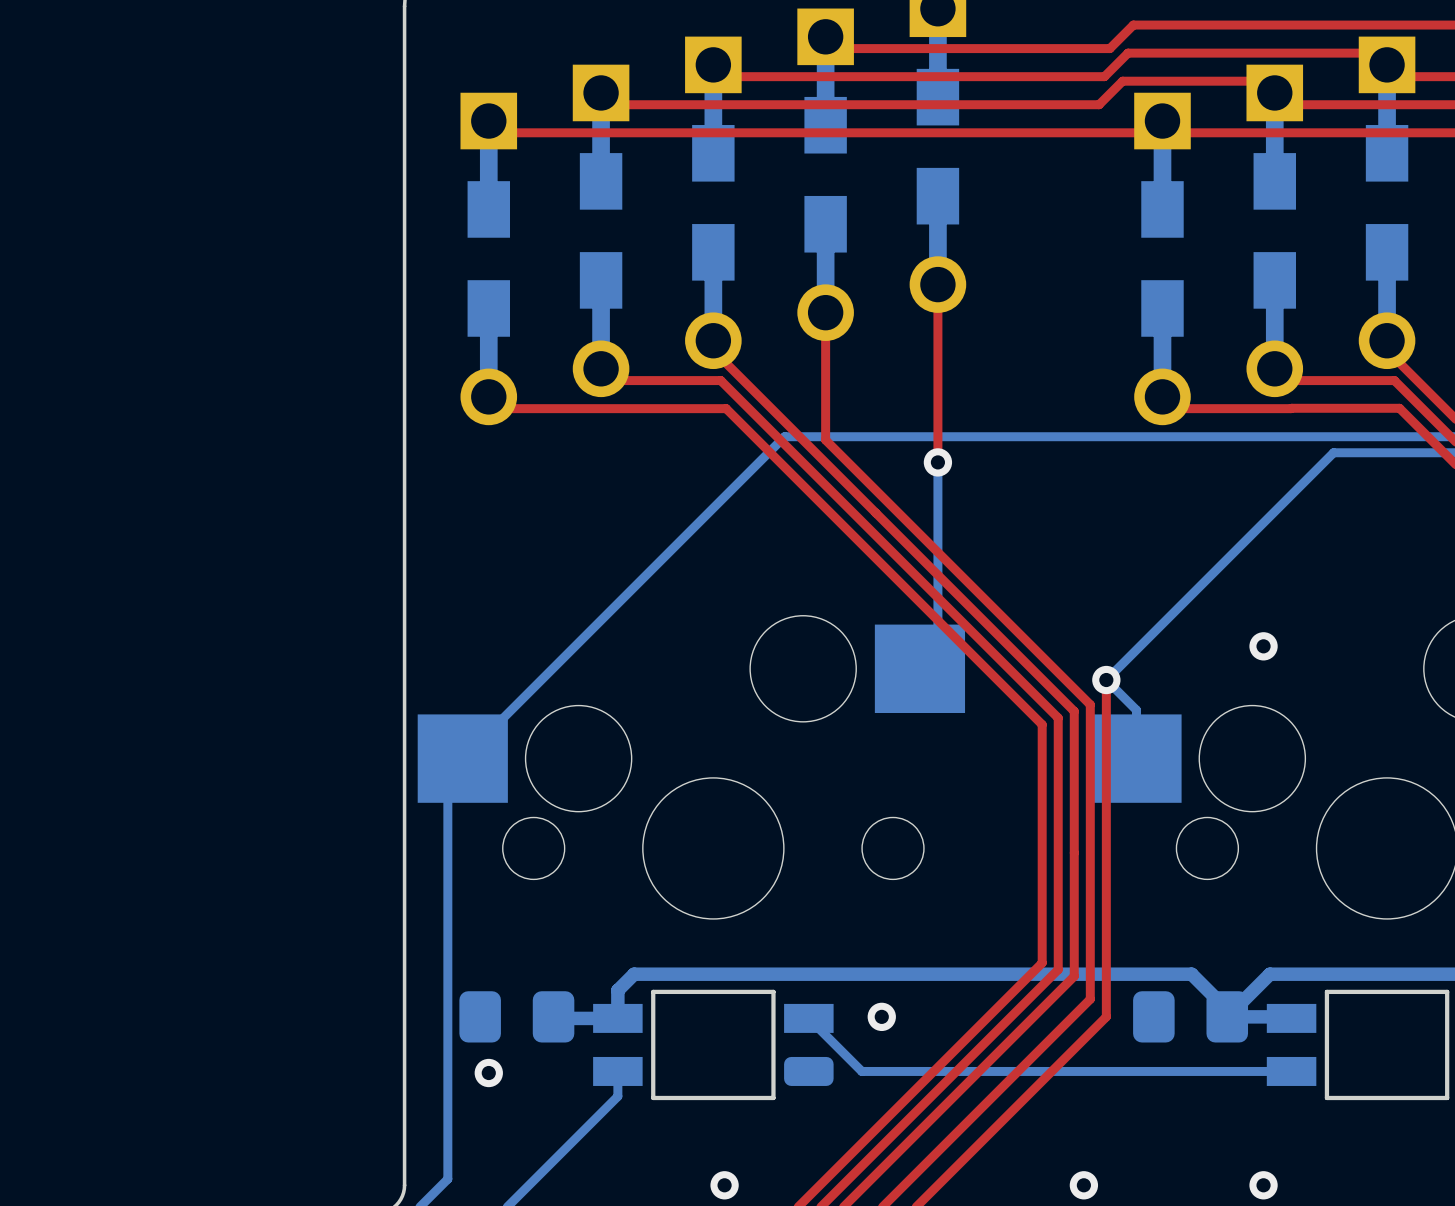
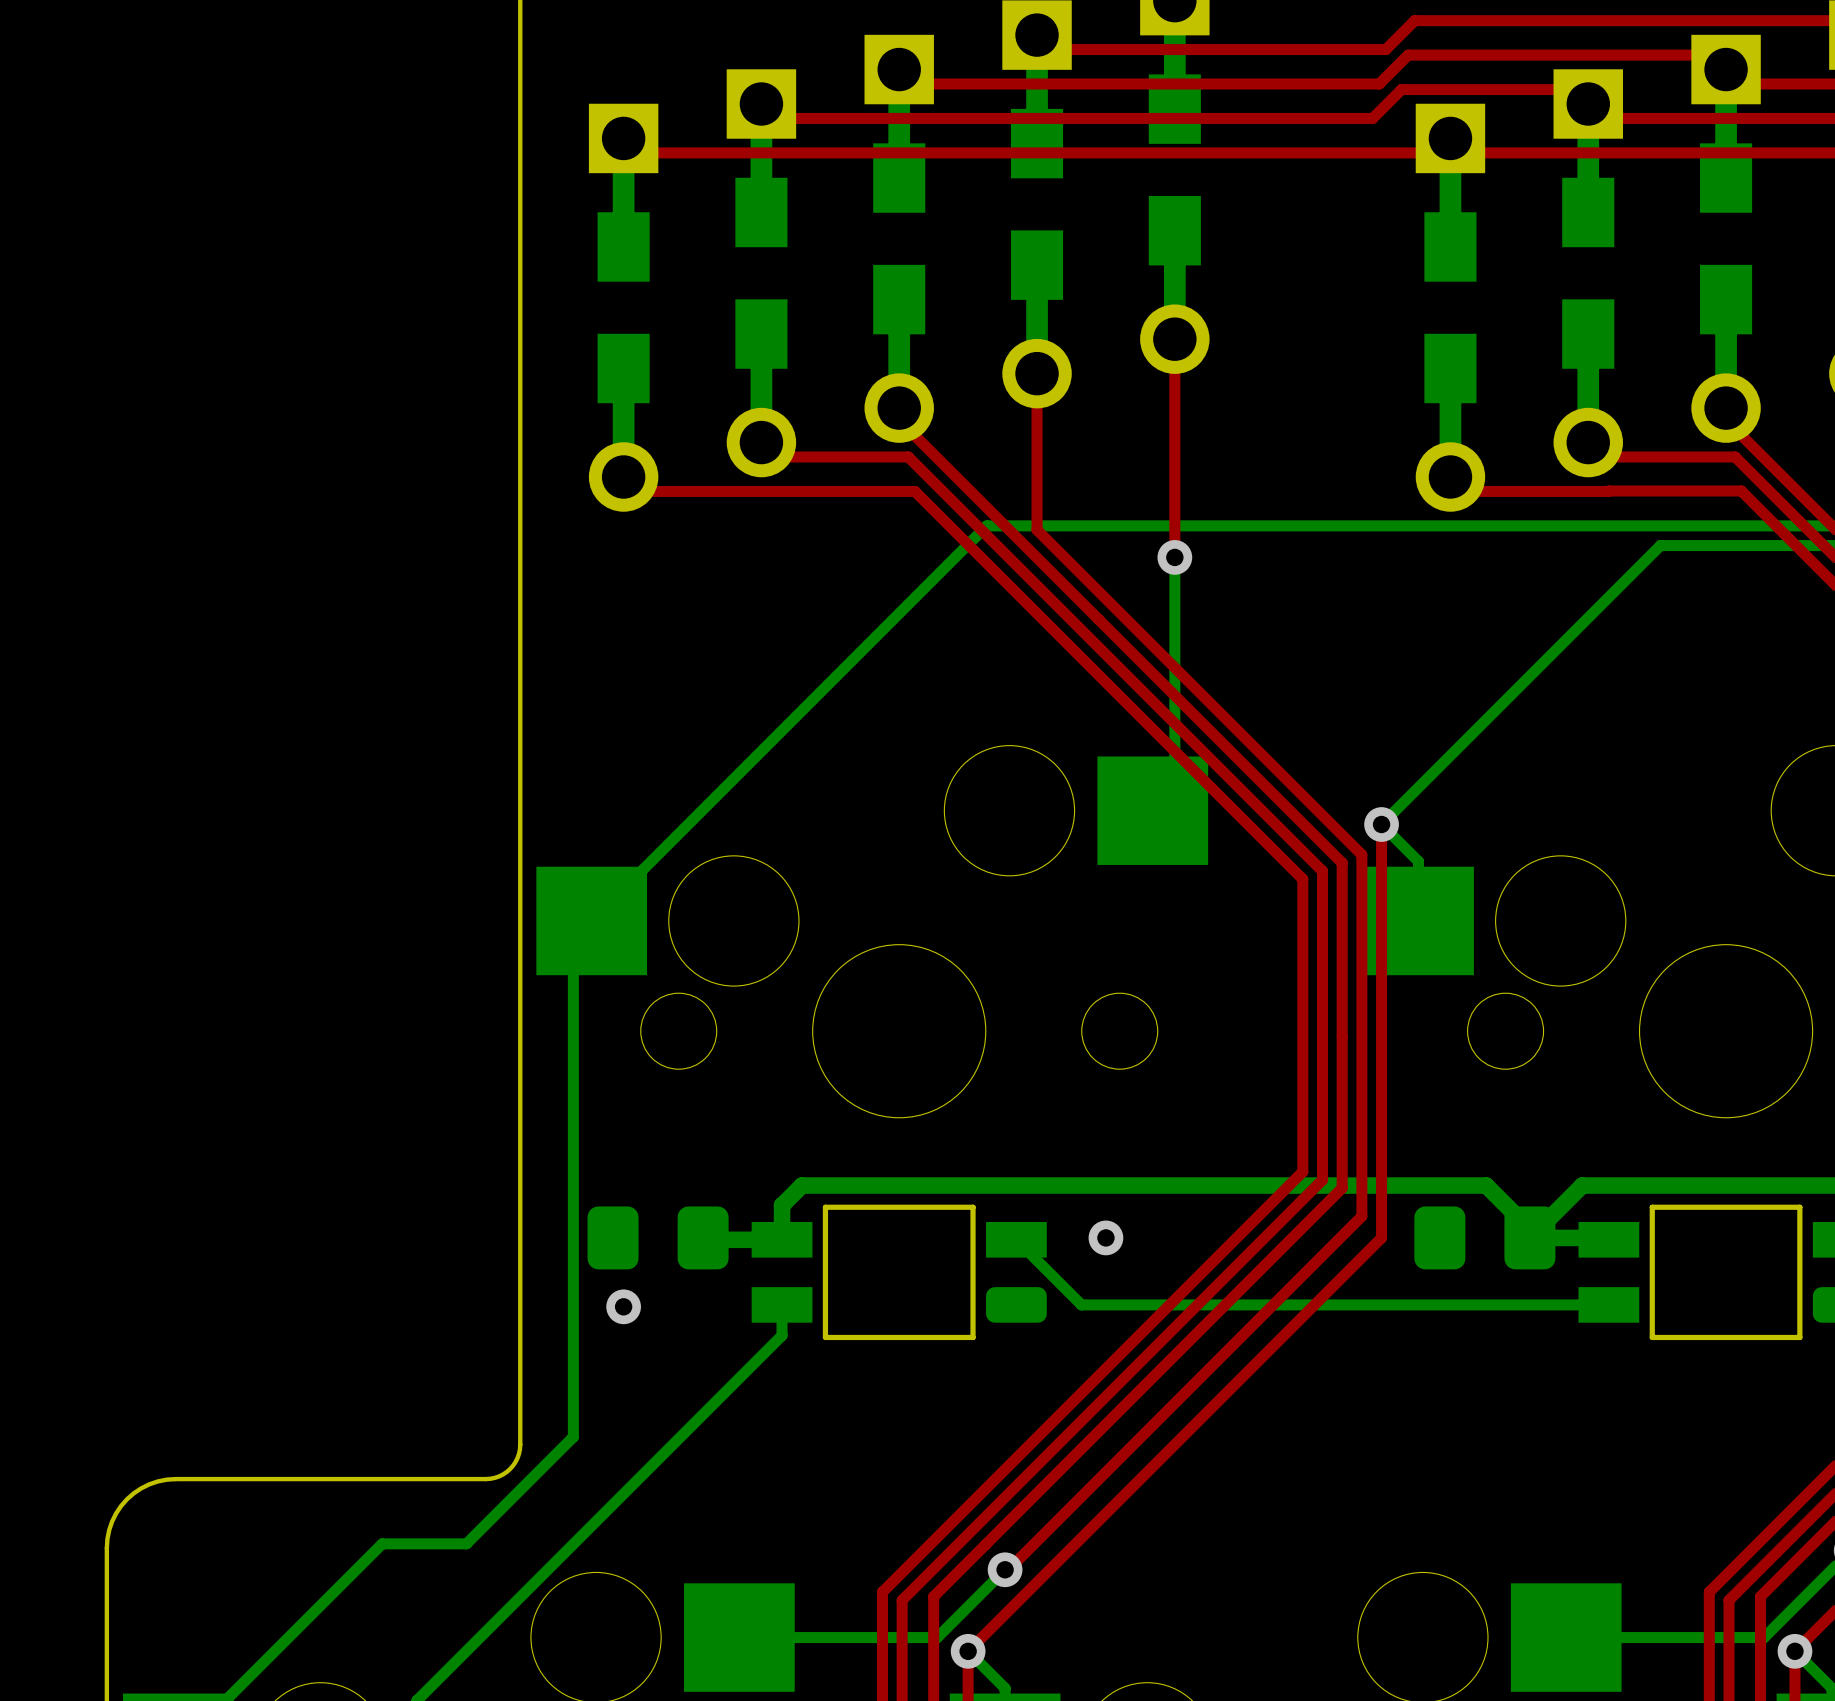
via: (1263, 646) -> none
via: (724, 1185) -> none
via: (1083, 1185) -> none
via: (1263, 1185) -> none

